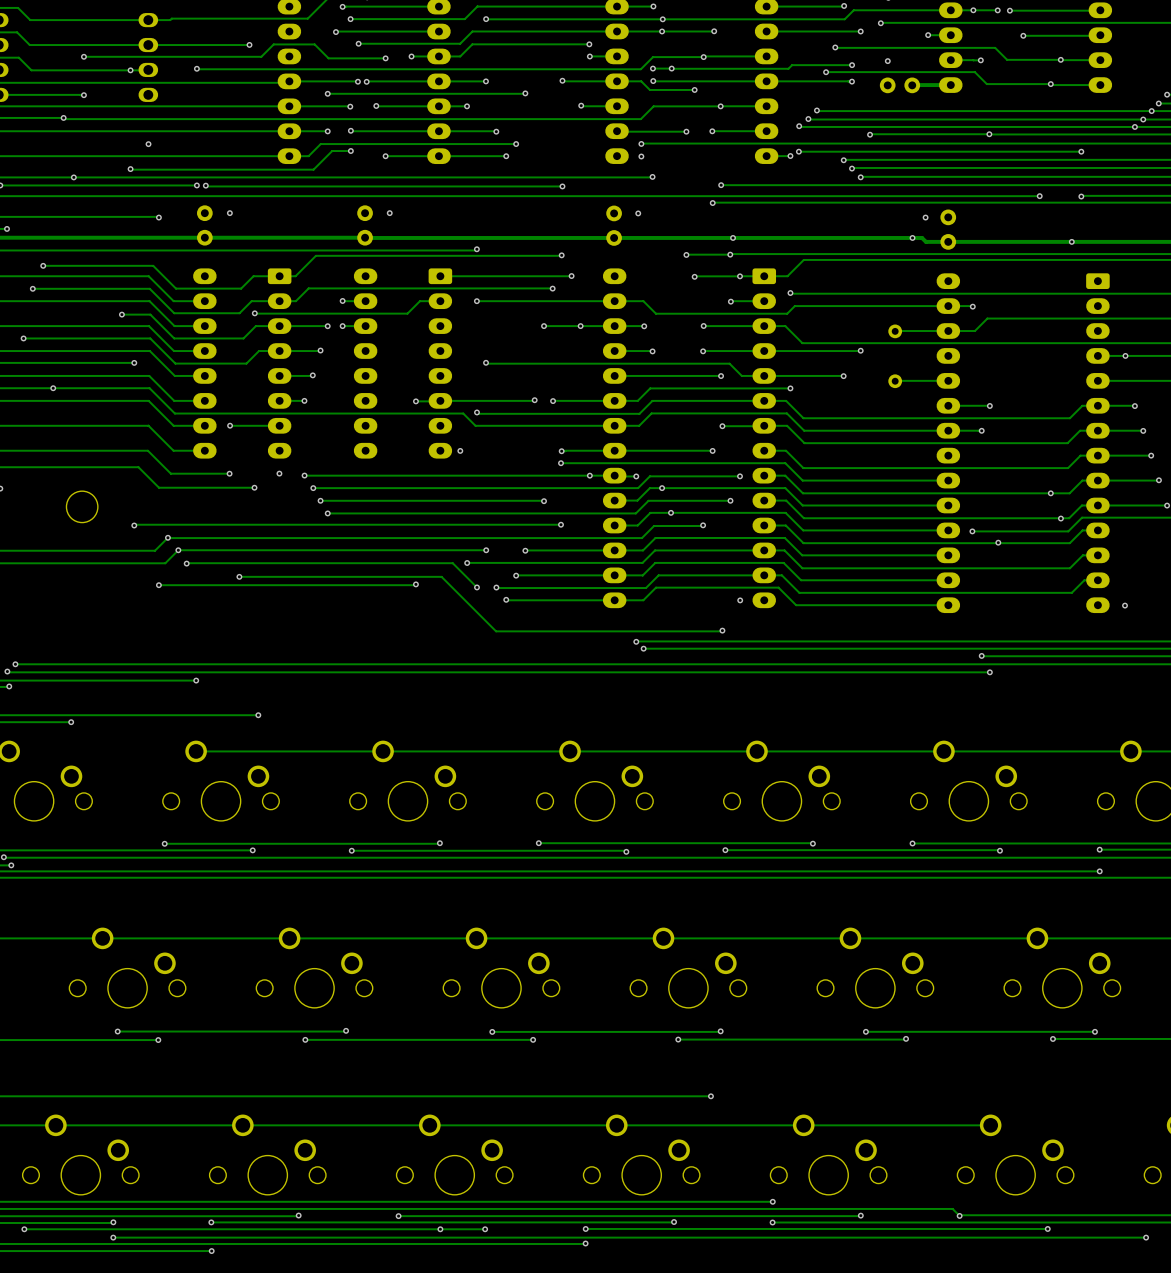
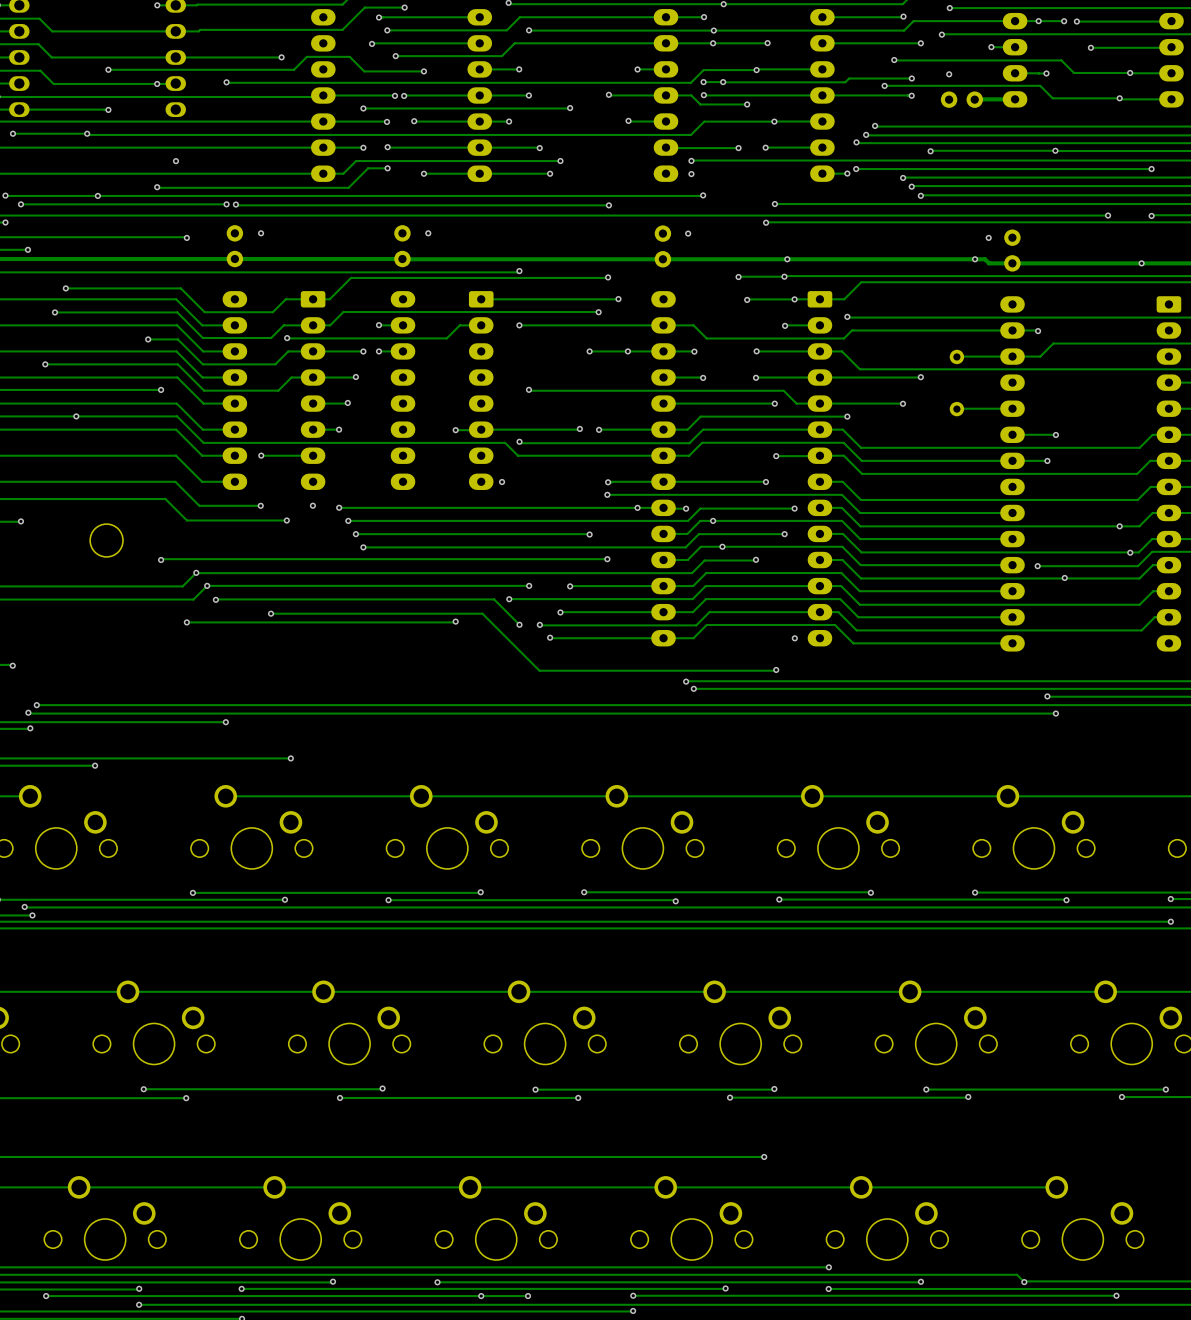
track: (589, 44) (472, 44) (460, 56) -> (519, 69) (502, 69)
via: (589, 44) -> none
via: (411, 56) -> none
track: (438, 56) (411, 56) -> none
via: none -> (519, 69)

